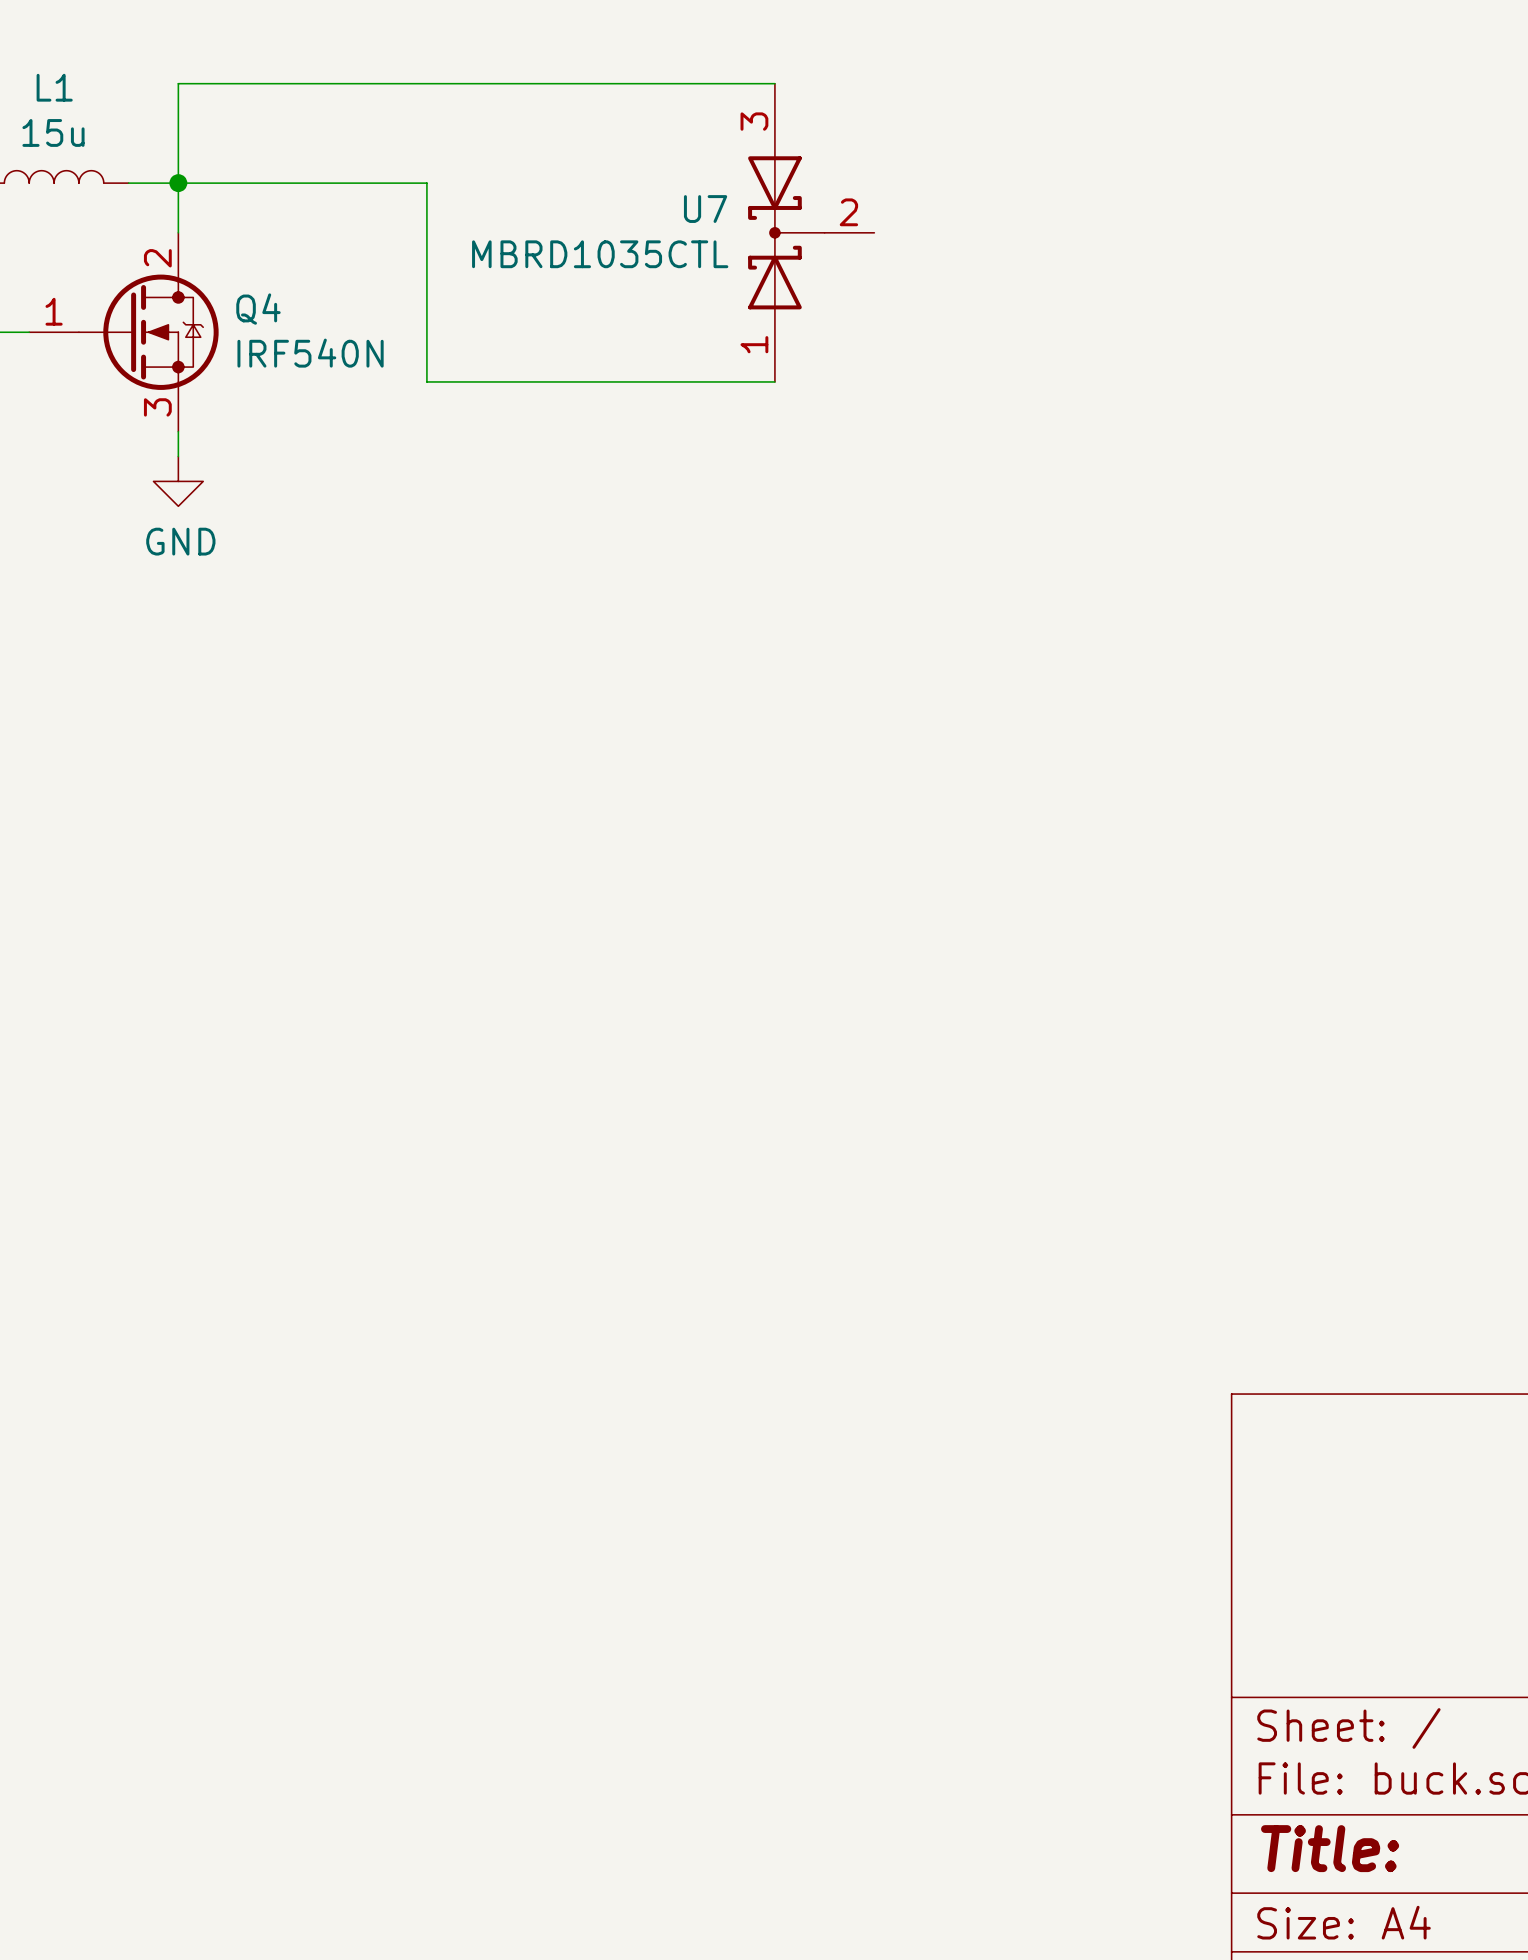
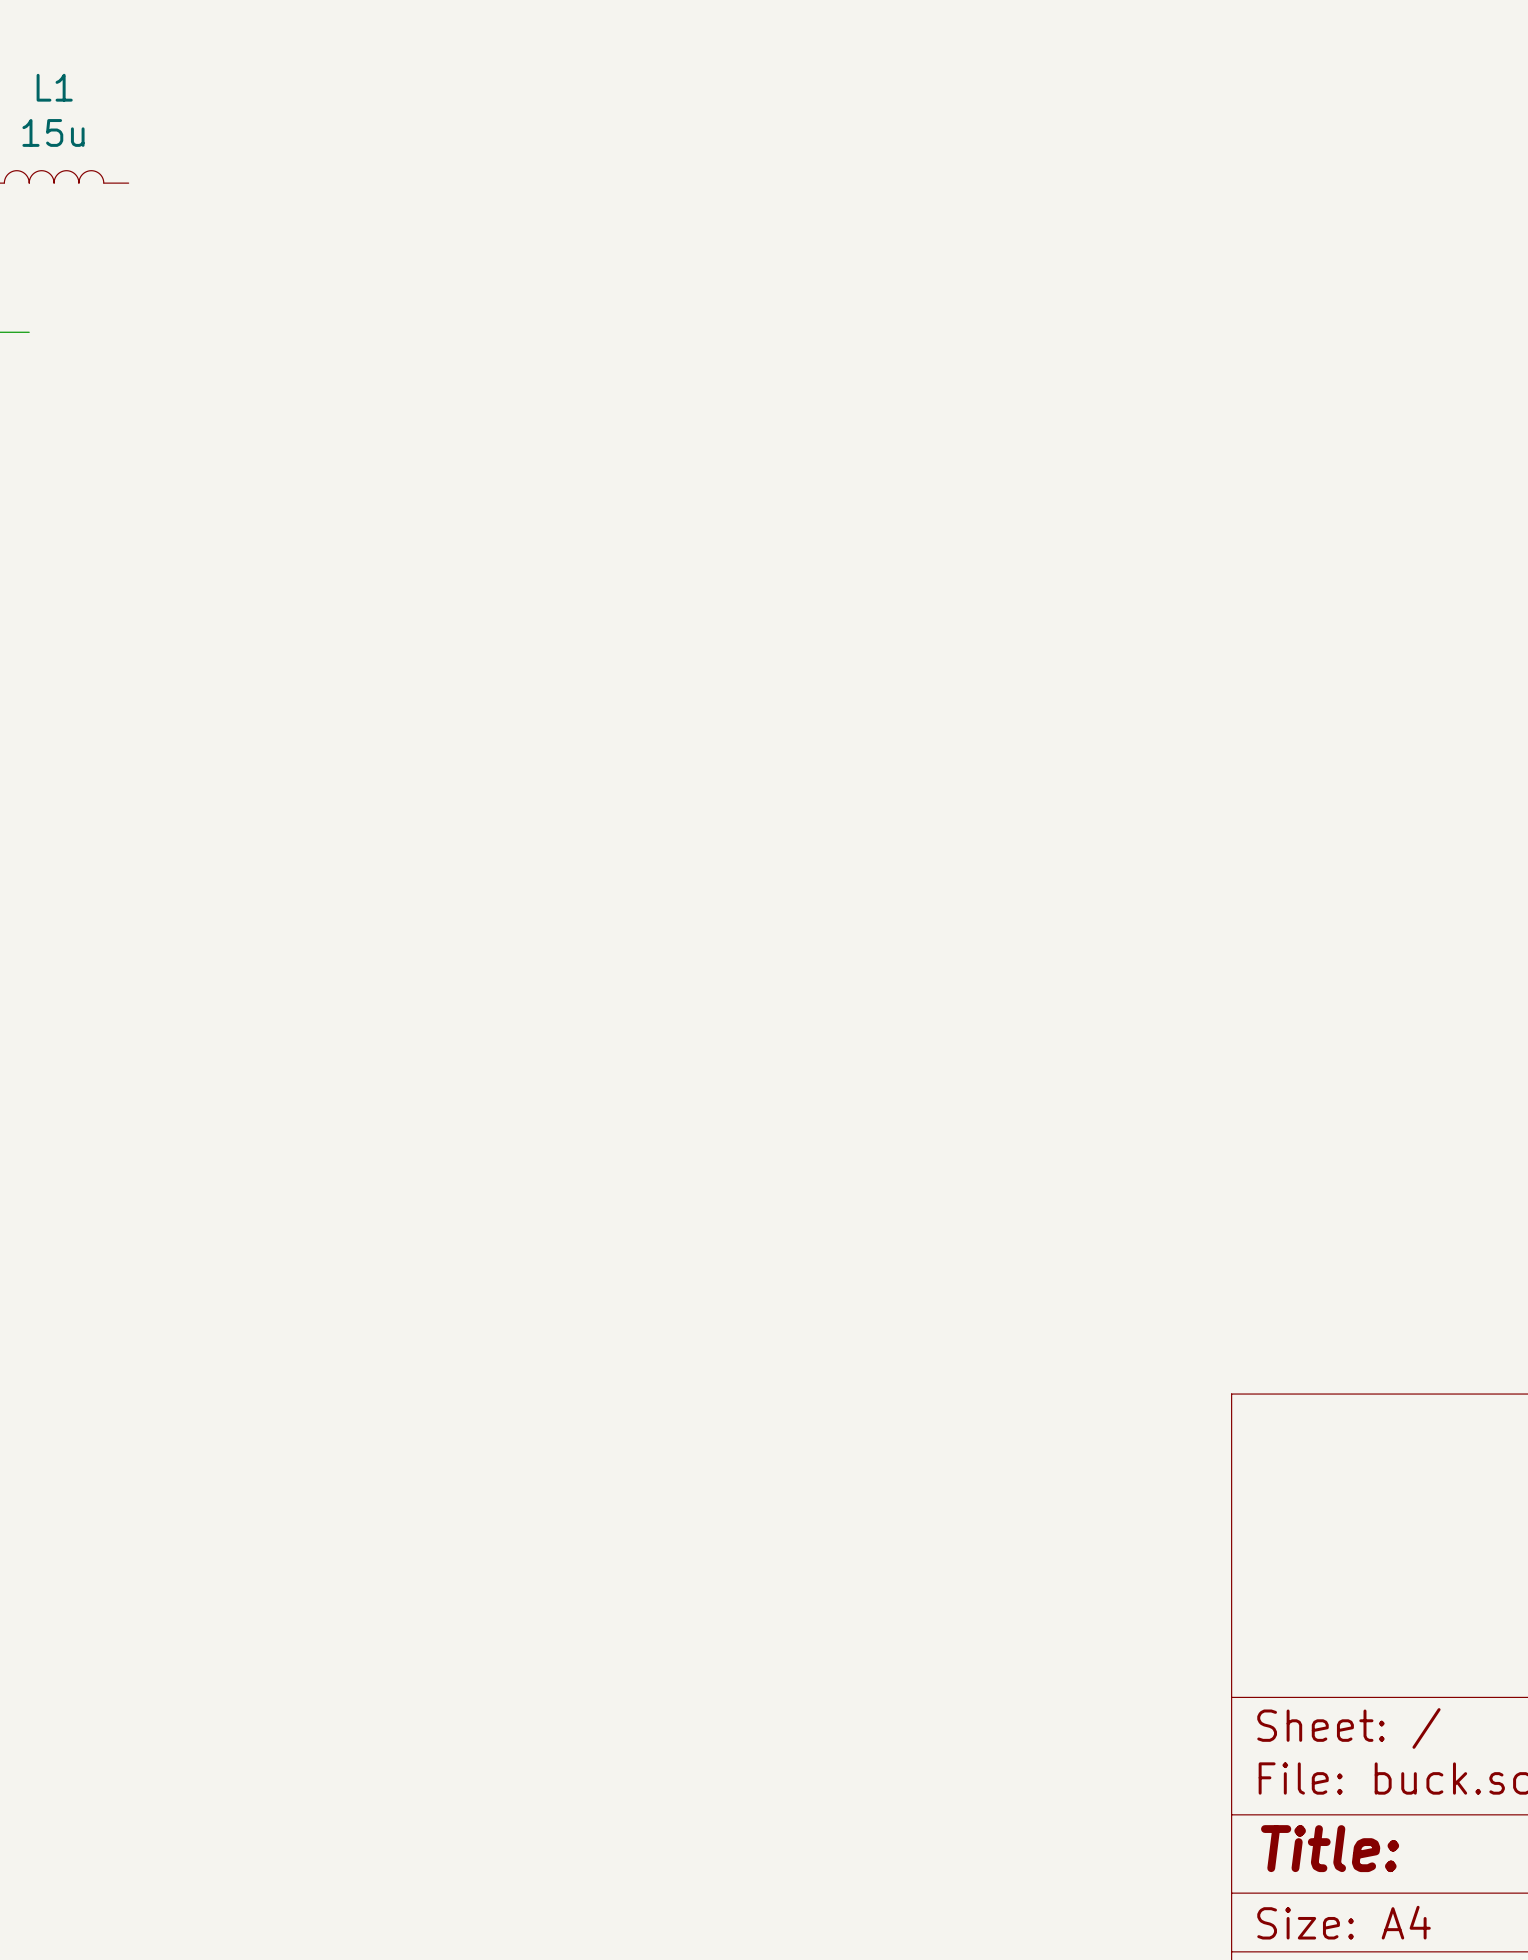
wire: (774, 83) (178, 83) (178, 232) -> none
wire: (128, 183) (426, 183) (426, 381) (774, 381) -> none
junction: (178, 183) -> none
U7: MBRD1035CTL (811, 232) -> none
Q4: IRF540N (123, 332) -> none
wire: (178, 431) (178, 456) -> none
power symbol: GND (178, 481) -> none

